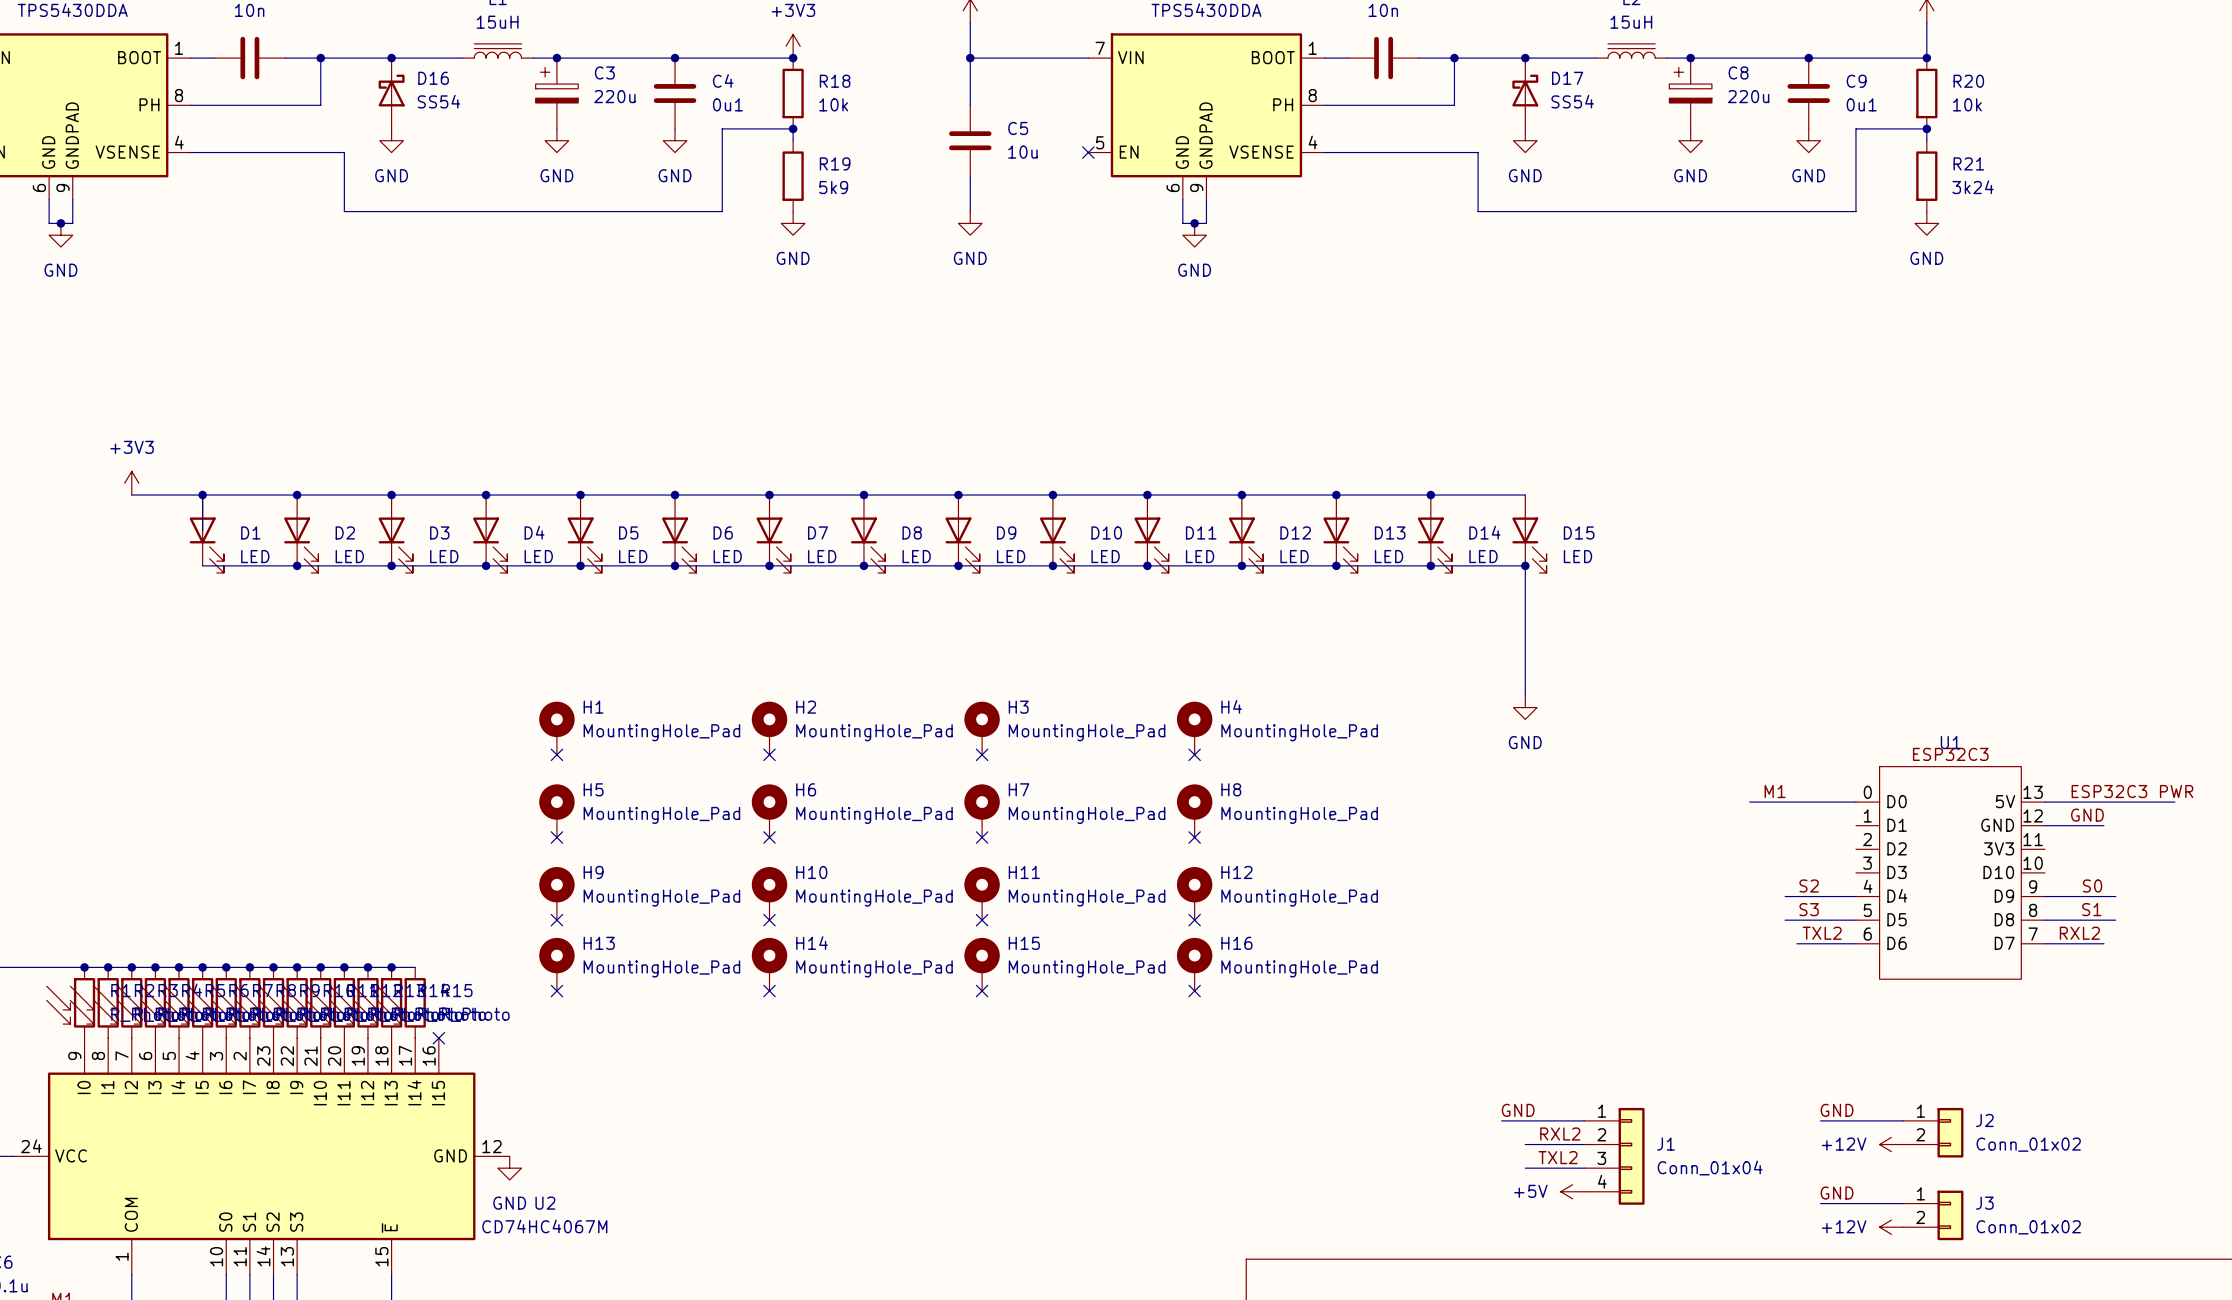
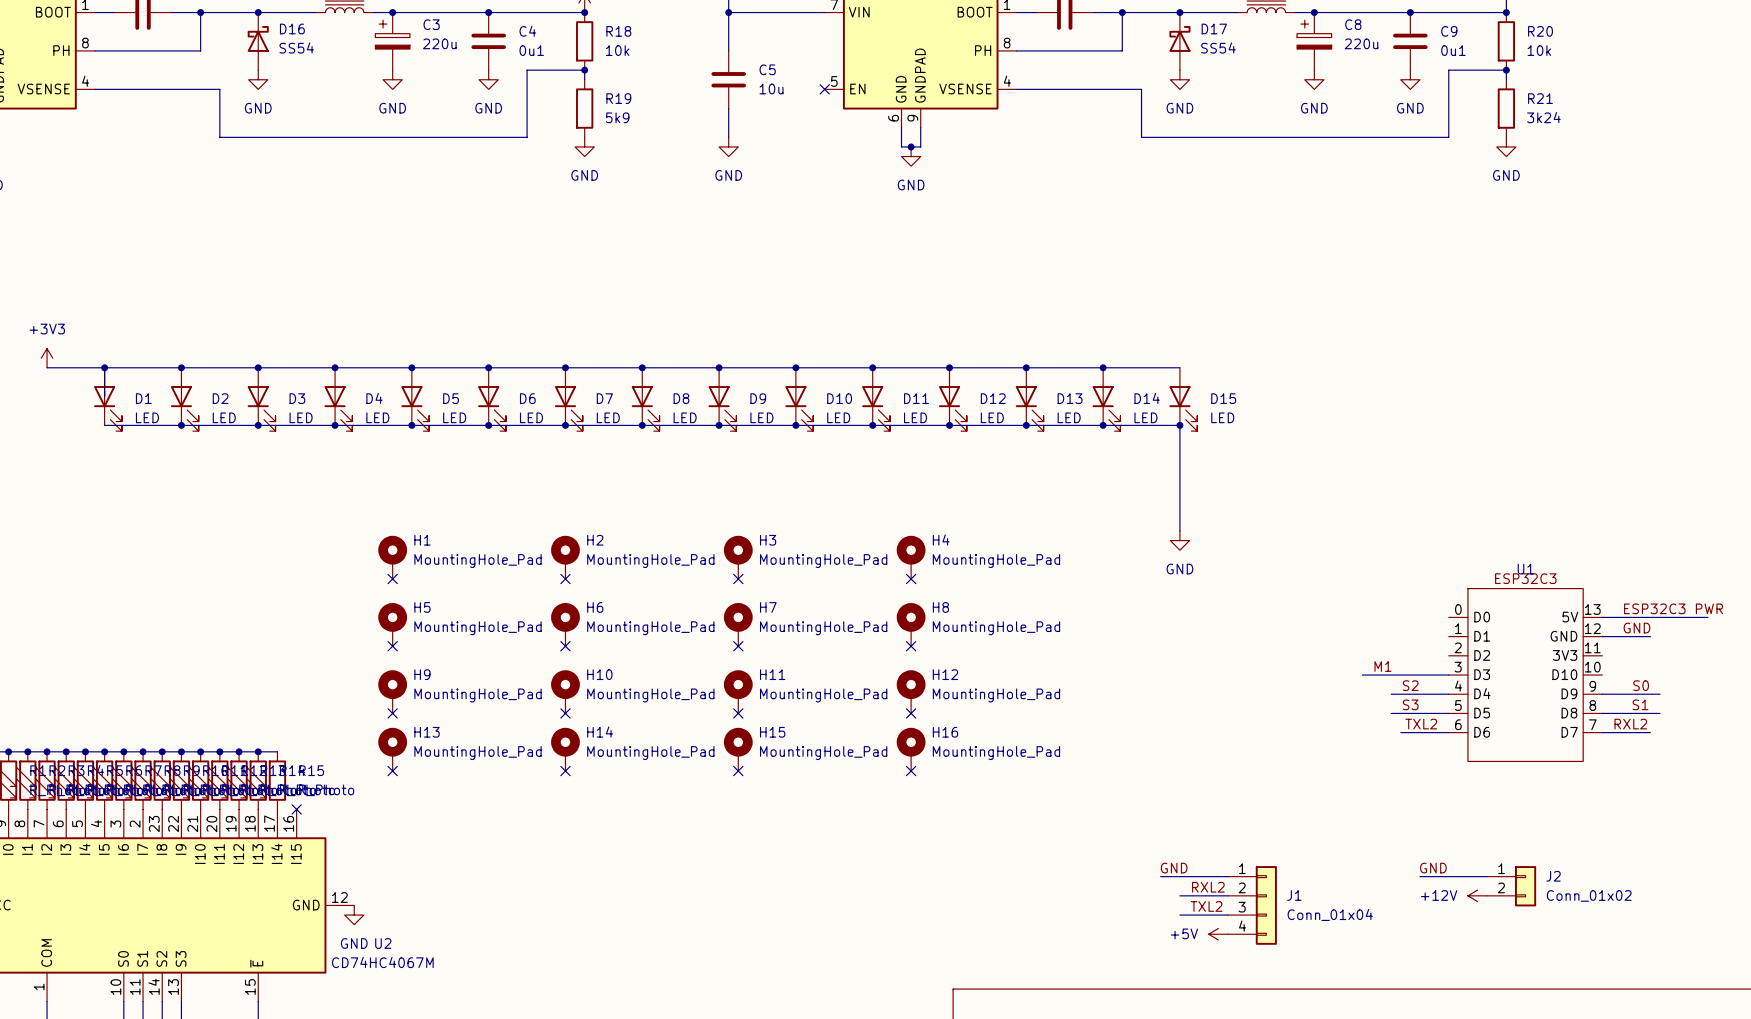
label position: M1 (1775, 791) -> M1 (1383, 666)
wire: (1749, 802) (1855, 802) -> (1362, 675) (1448, 675)
label: GND (1837, 1193) -> none
wire: (1820, 1203) (1903, 1203) -> none
J3: Conn_01x02 (1933, 1215) -> none
power symbol: +12V (1891, 1227) -> none

